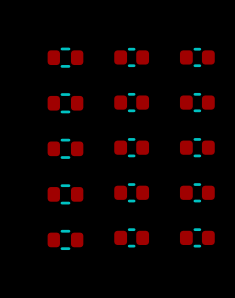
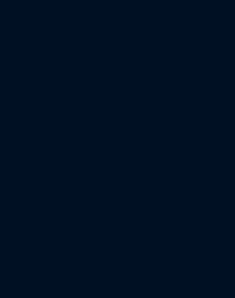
part: (65, 57) -> none
part: (131, 57) -> none
part: (197, 57) -> none
part: (131, 102) -> none
part: (197, 102) -> none
part: (65, 103) -> none
part: (131, 147) -> none
part: (197, 147) -> none
part: (65, 148) -> none
part: (131, 192) -> none
part: (197, 192) -> none
part: (65, 194) -> none
part: (131, 237) -> none
part: (197, 237) -> none
part: (65, 239) -> none

